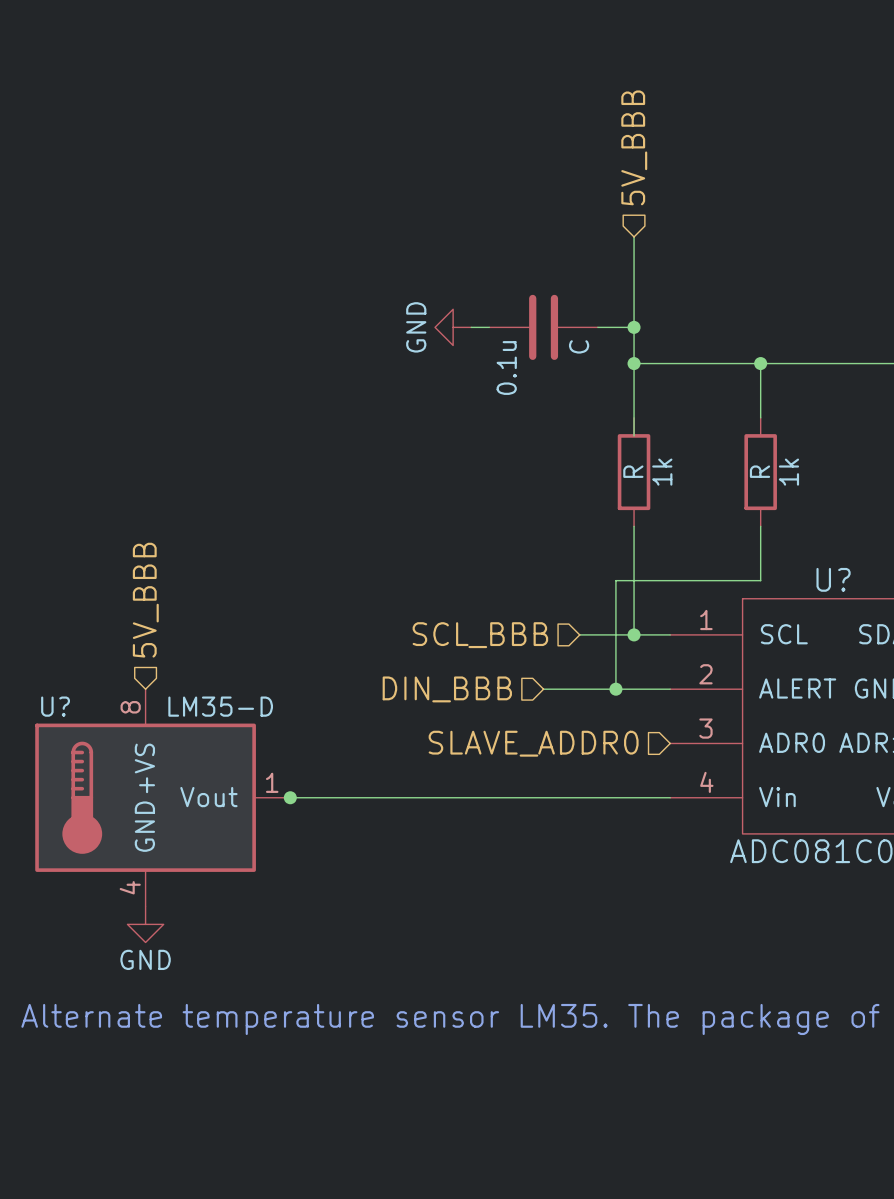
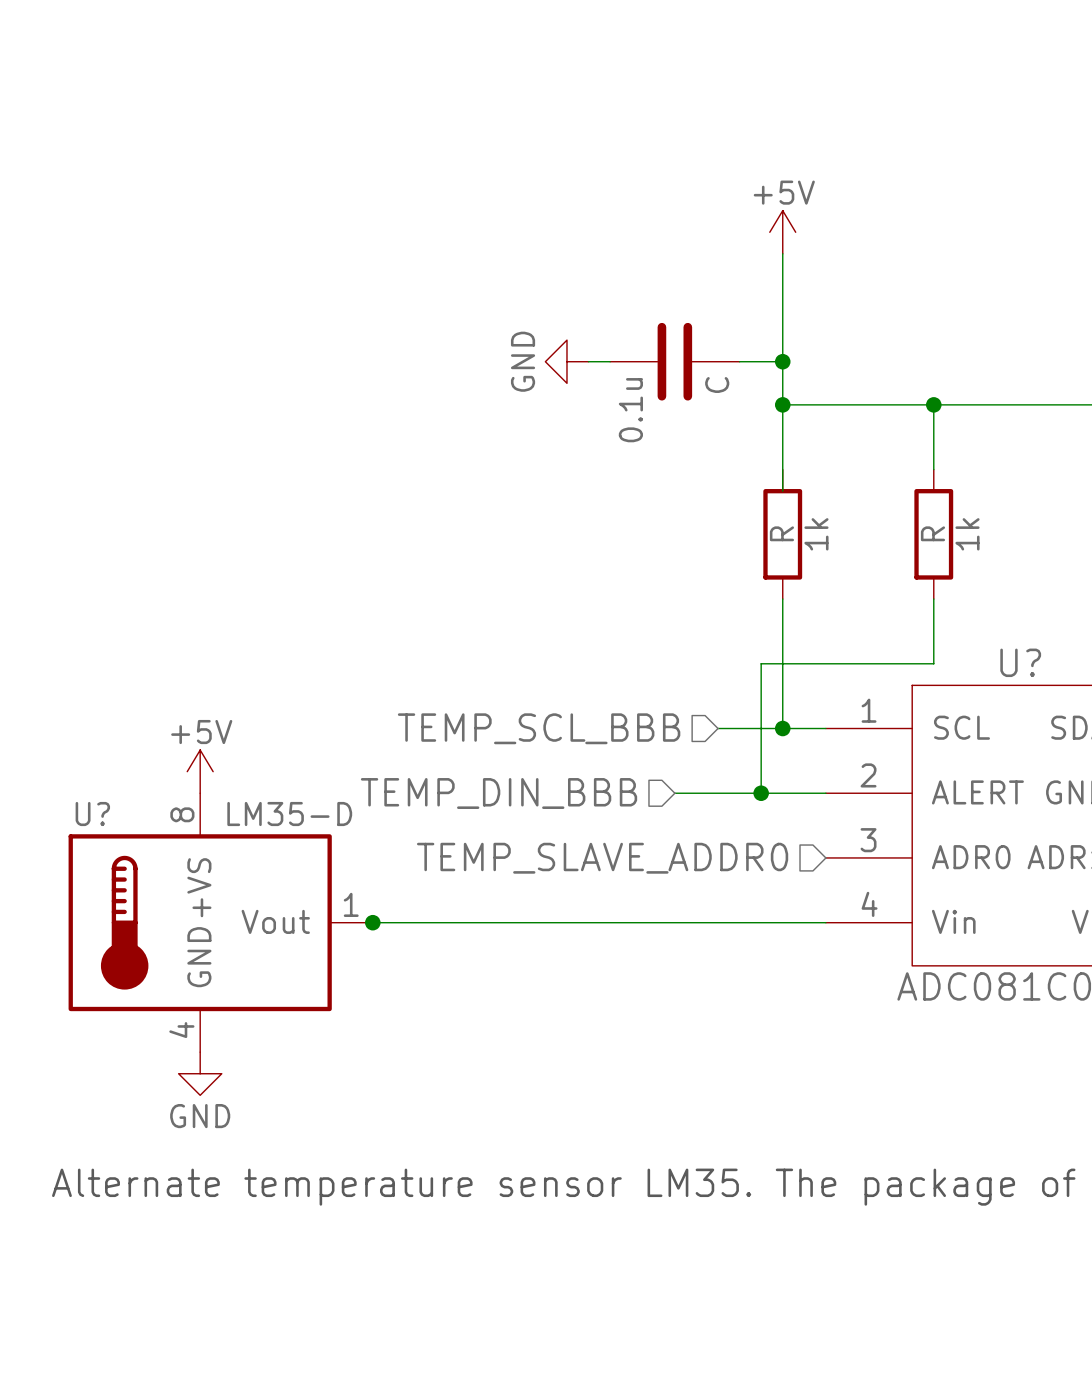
hierarchical label: 5V_BBB (634, 147) -> none
power symbol: none -> +5V (782, 232)
hierarchical label: 5V_BBB (145, 600) -> none
hierarchical label: SCL_BBB (480, 635) -> TEMP_SCL_BBB (539, 728)
power symbol: none -> +5V (200, 771)
hierarchical label: DIN_BBB (447, 689) -> TEMP_DIN_BBB (499, 793)
hierarchical label: SLAVE_ADDR0 (533, 743) -> TEMP_SLAVE_ADDR0 (602, 858)

